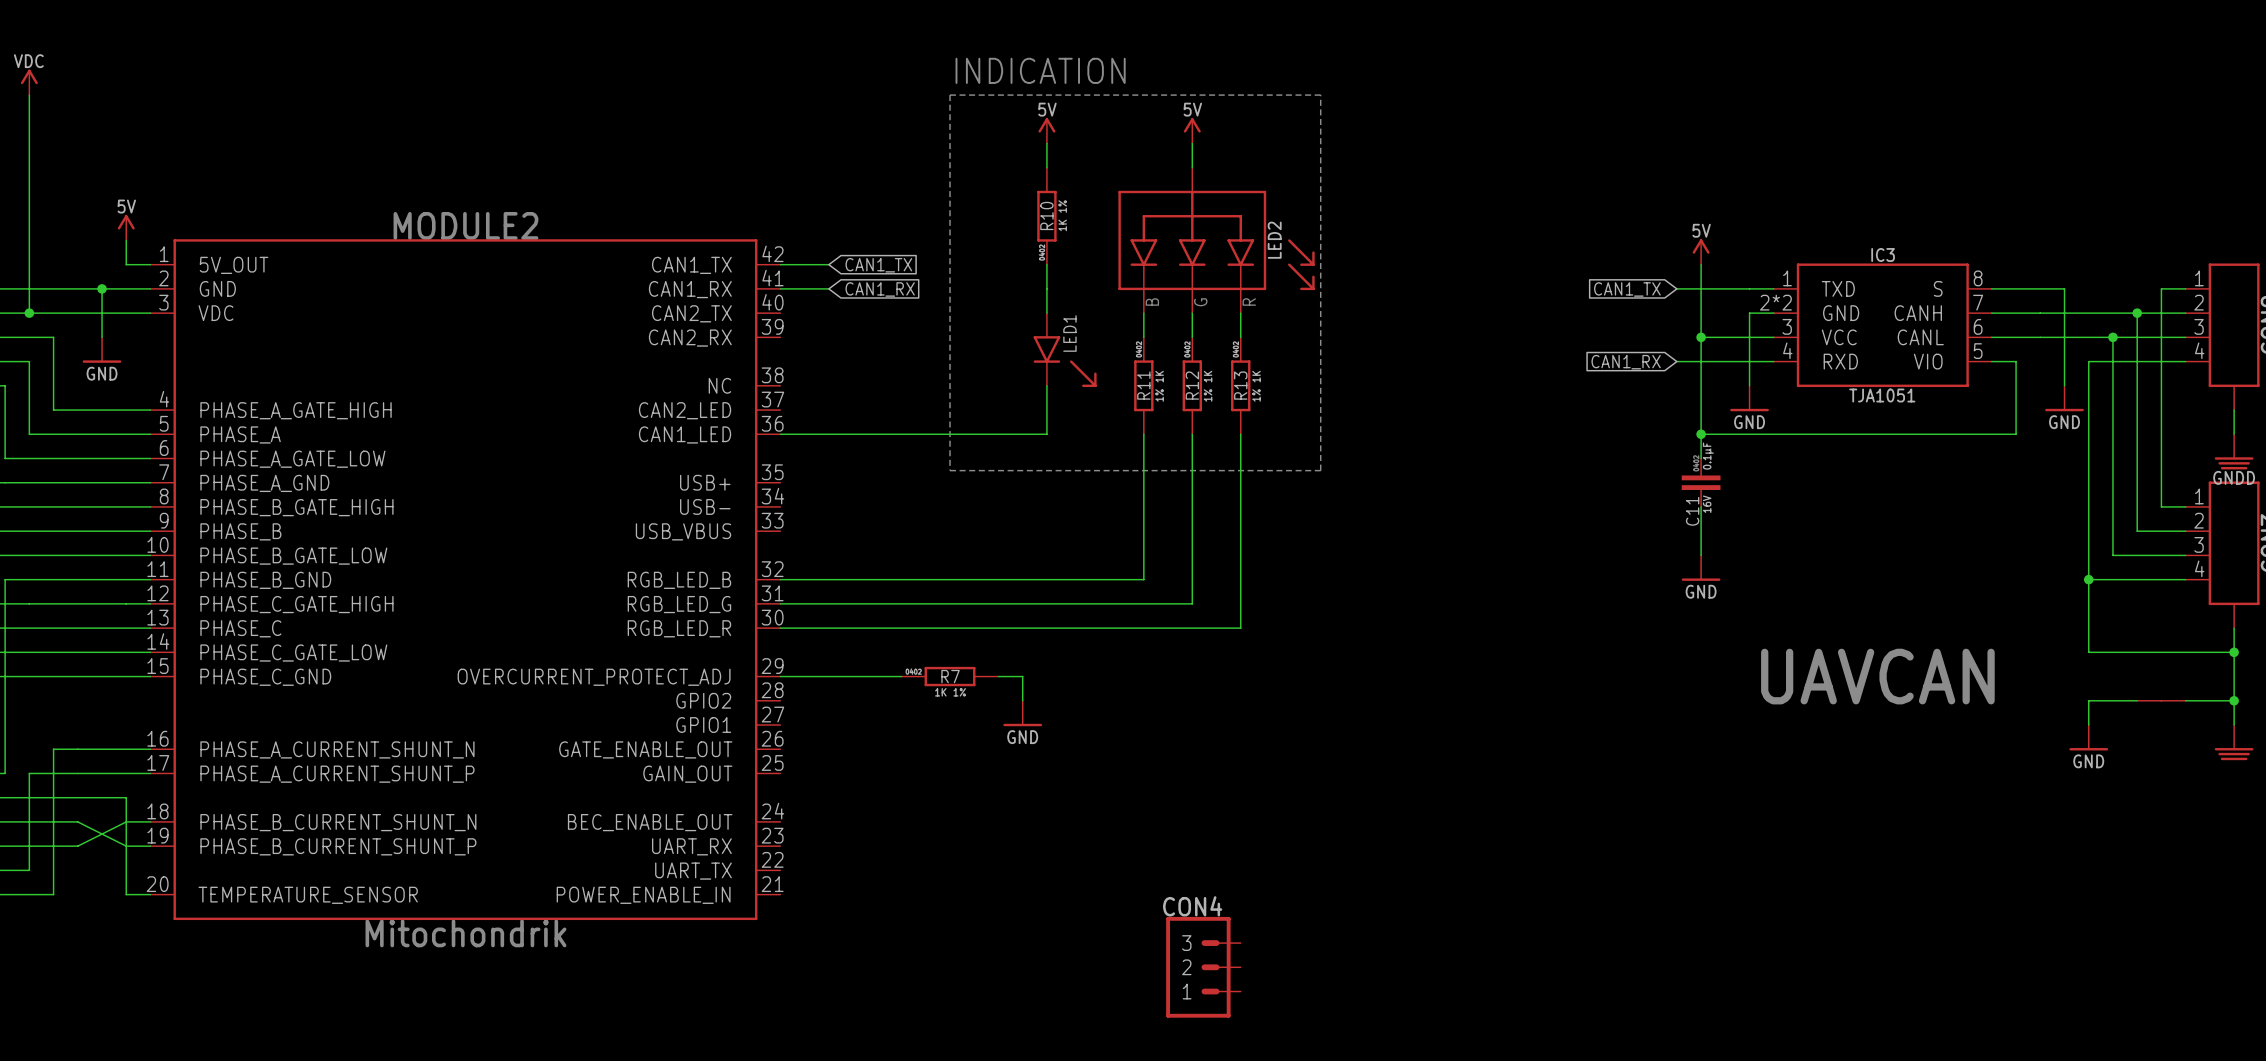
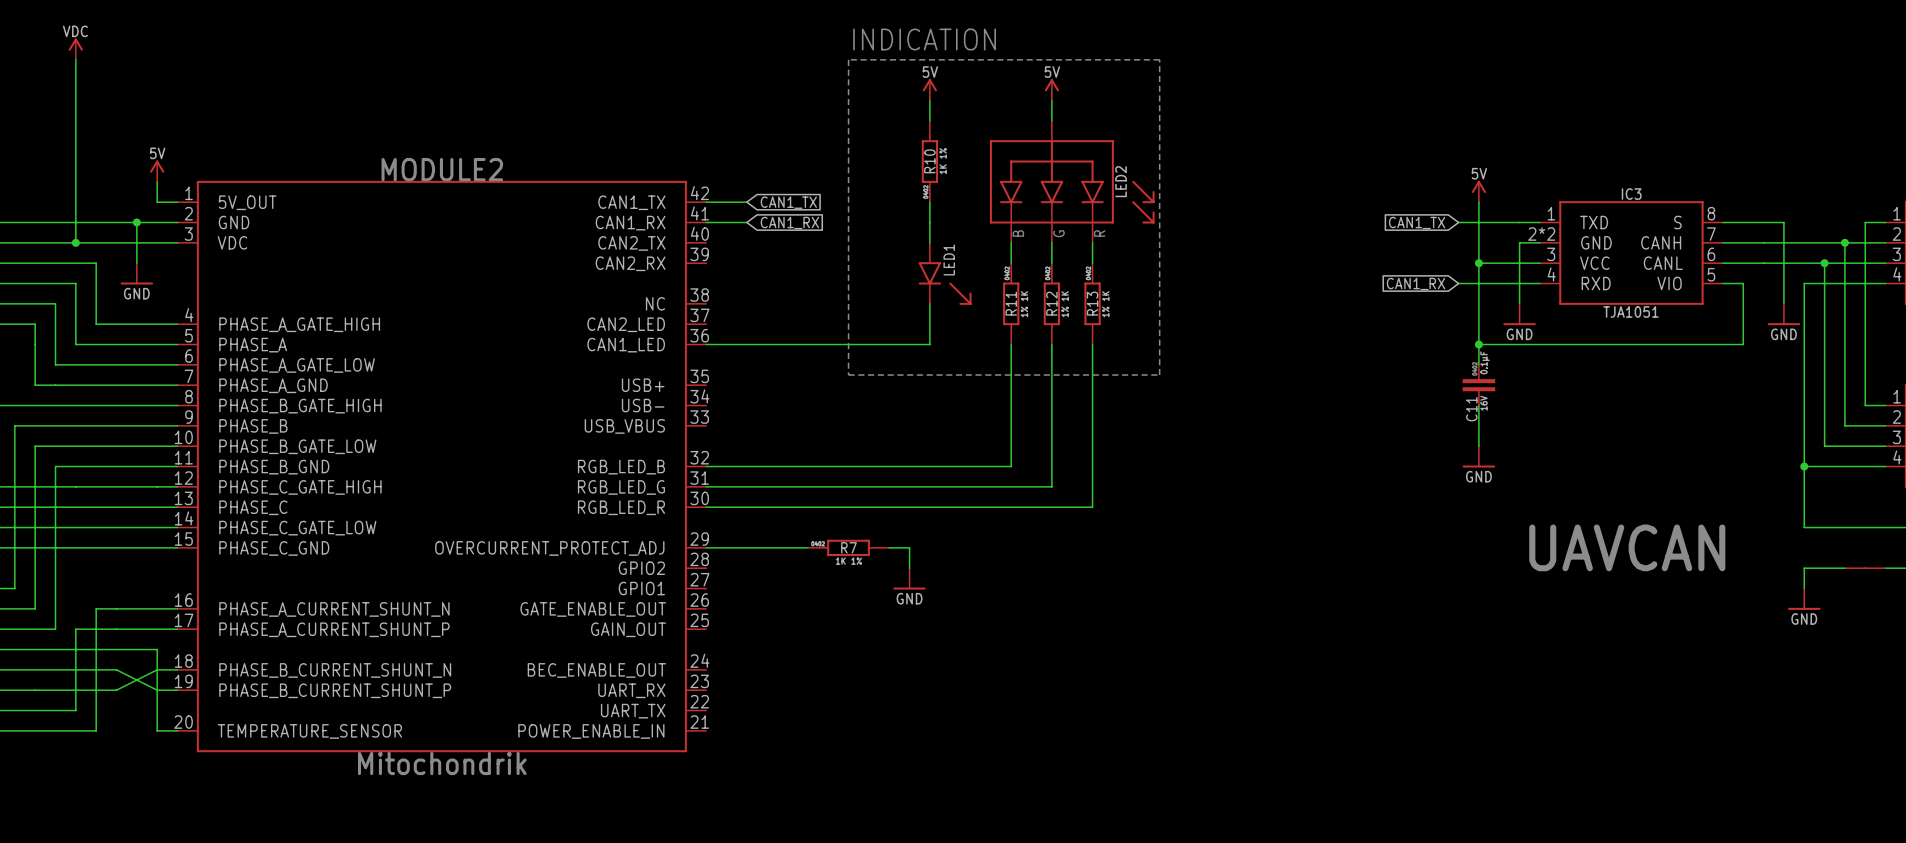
CON4: (1203, 967) -> none

